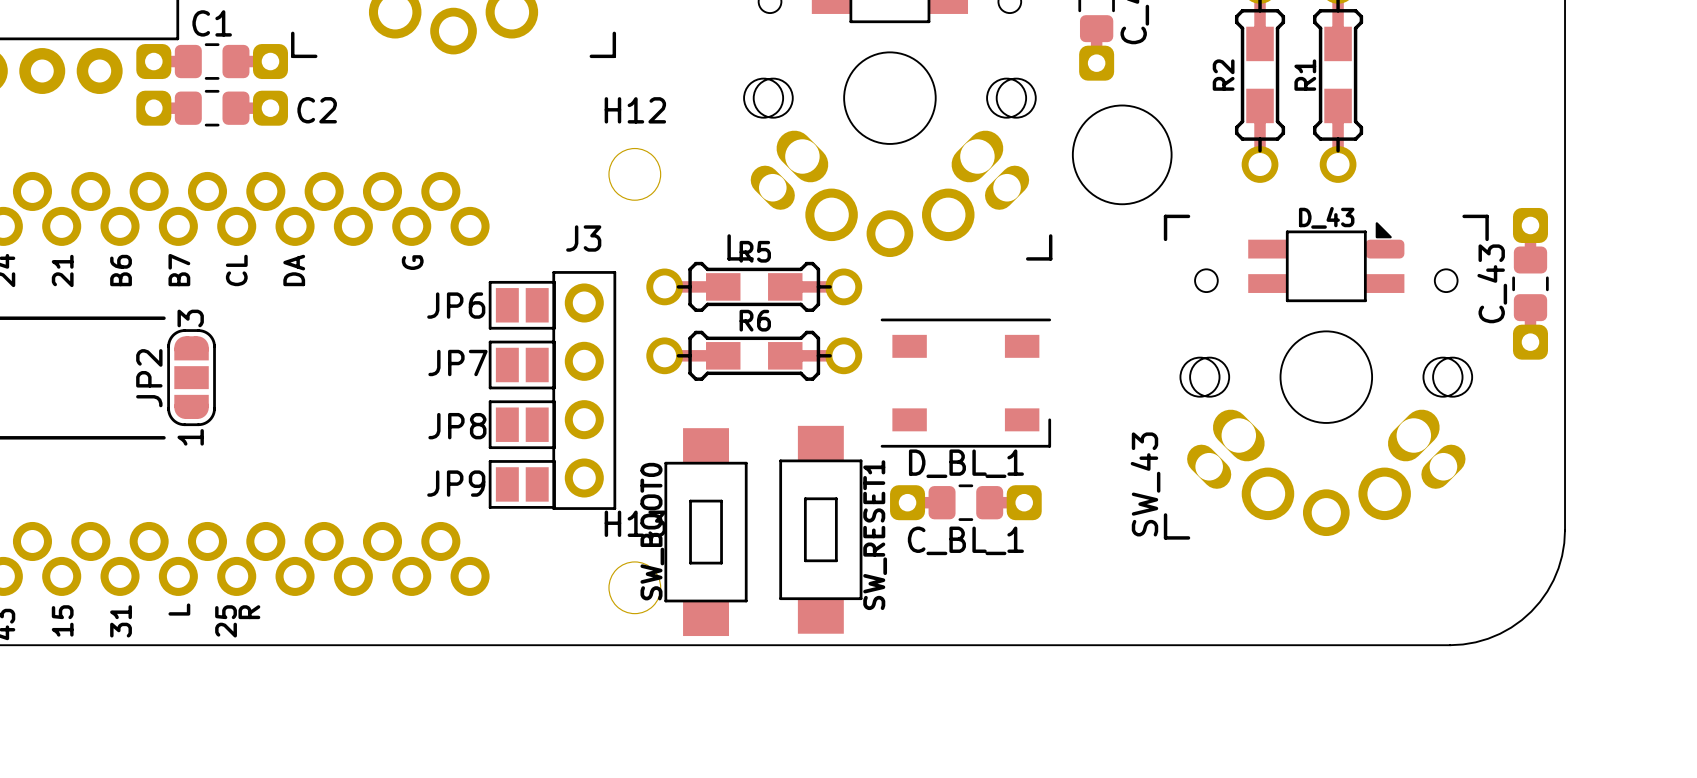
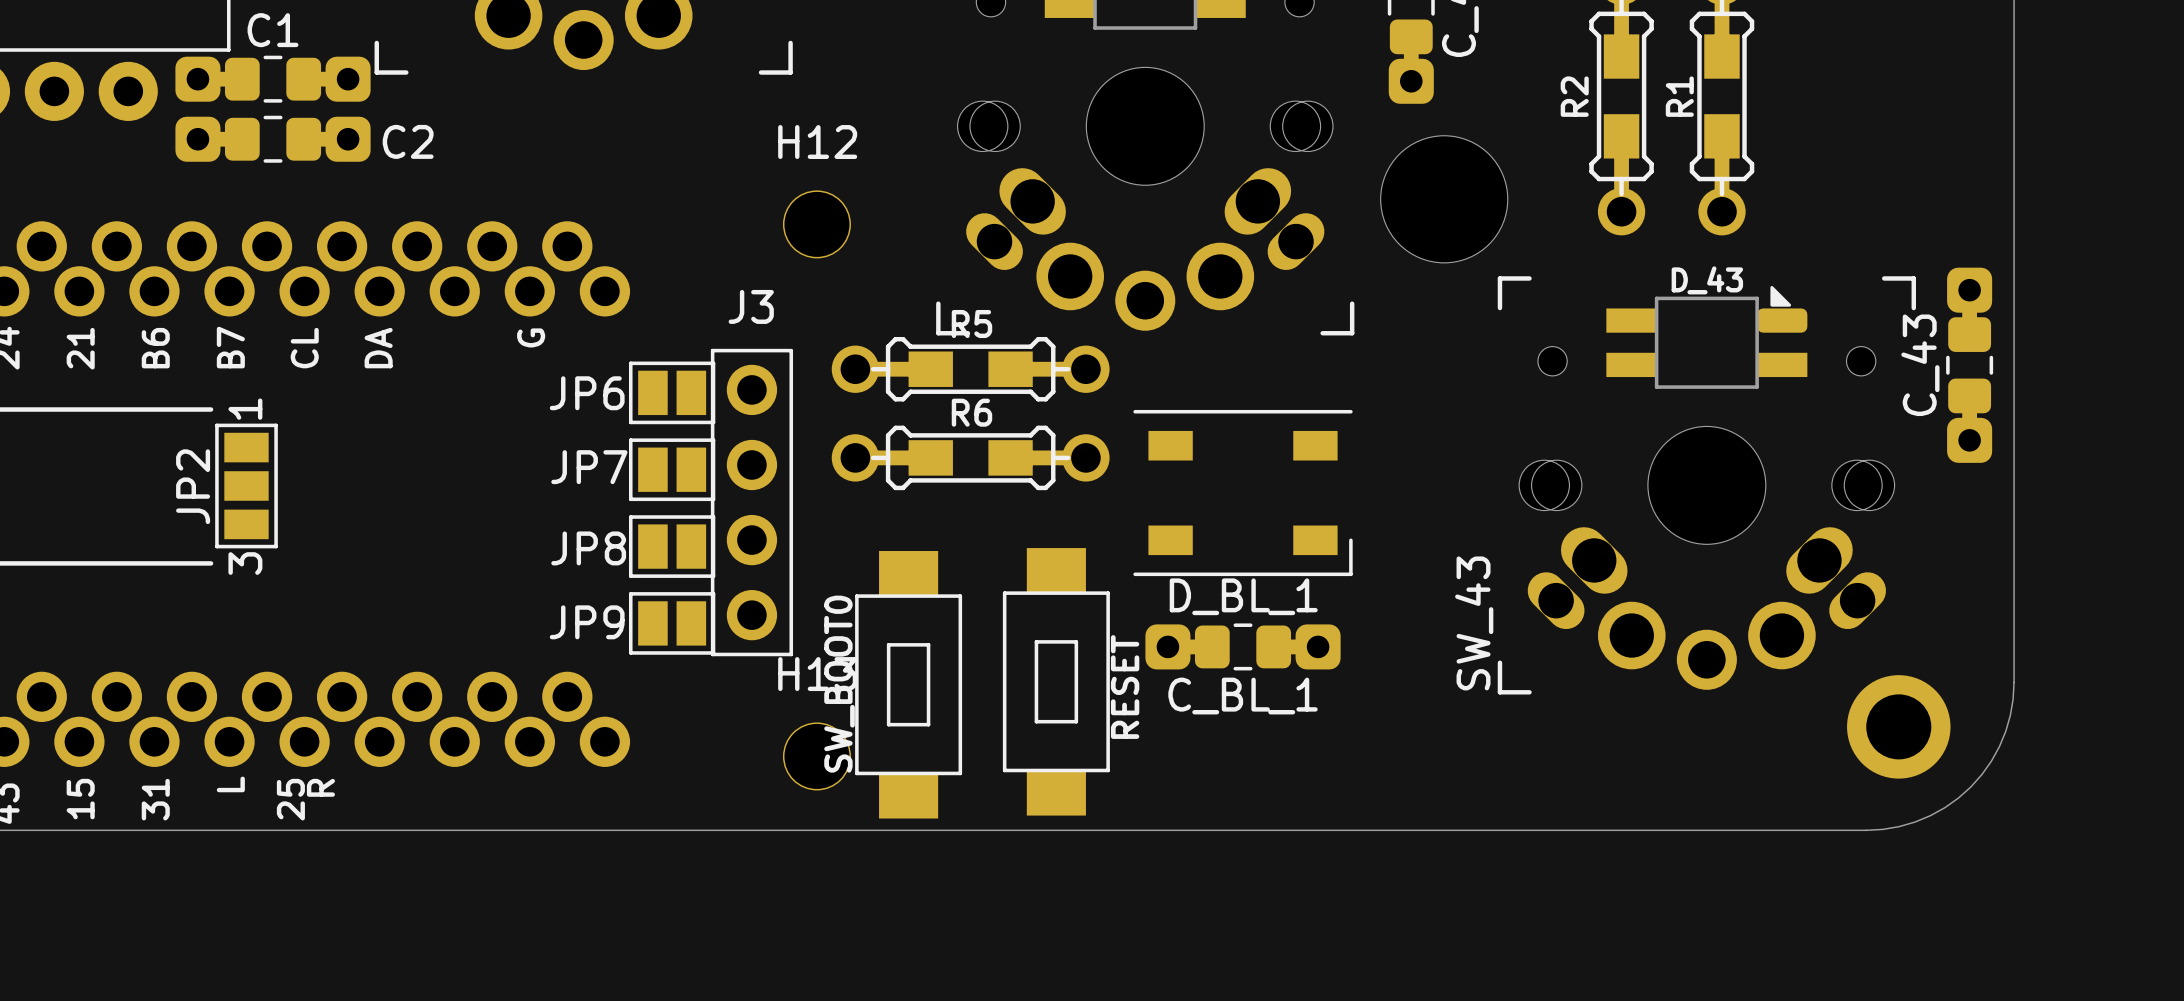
JP2 footprint: [167, 329, 216, 427] -> [215, 423, 278, 549]
SW_RESET1 name: SW_RESET1 (875, 535) -> RESET (1125, 687)
part: none -> (1898, 726)

